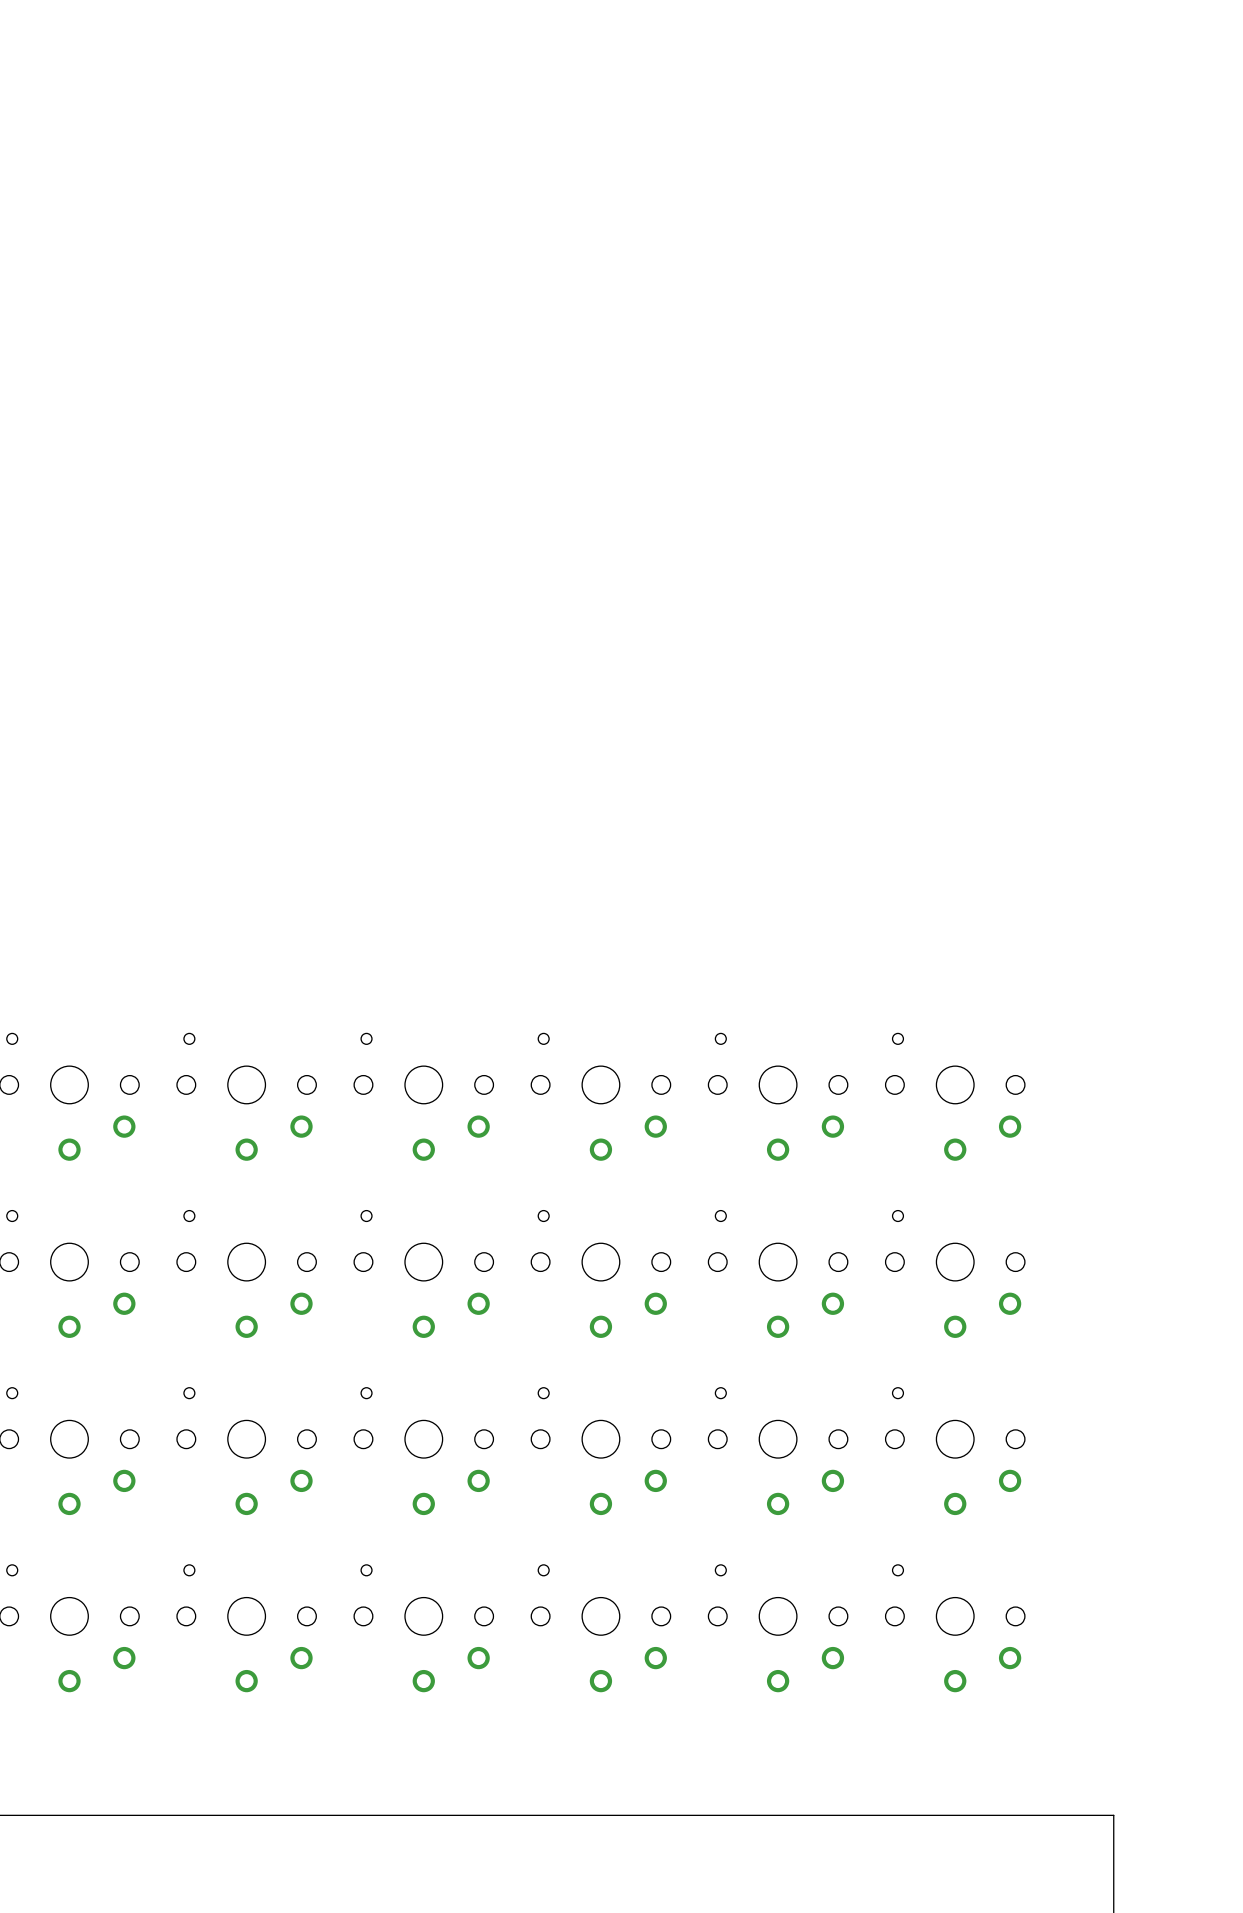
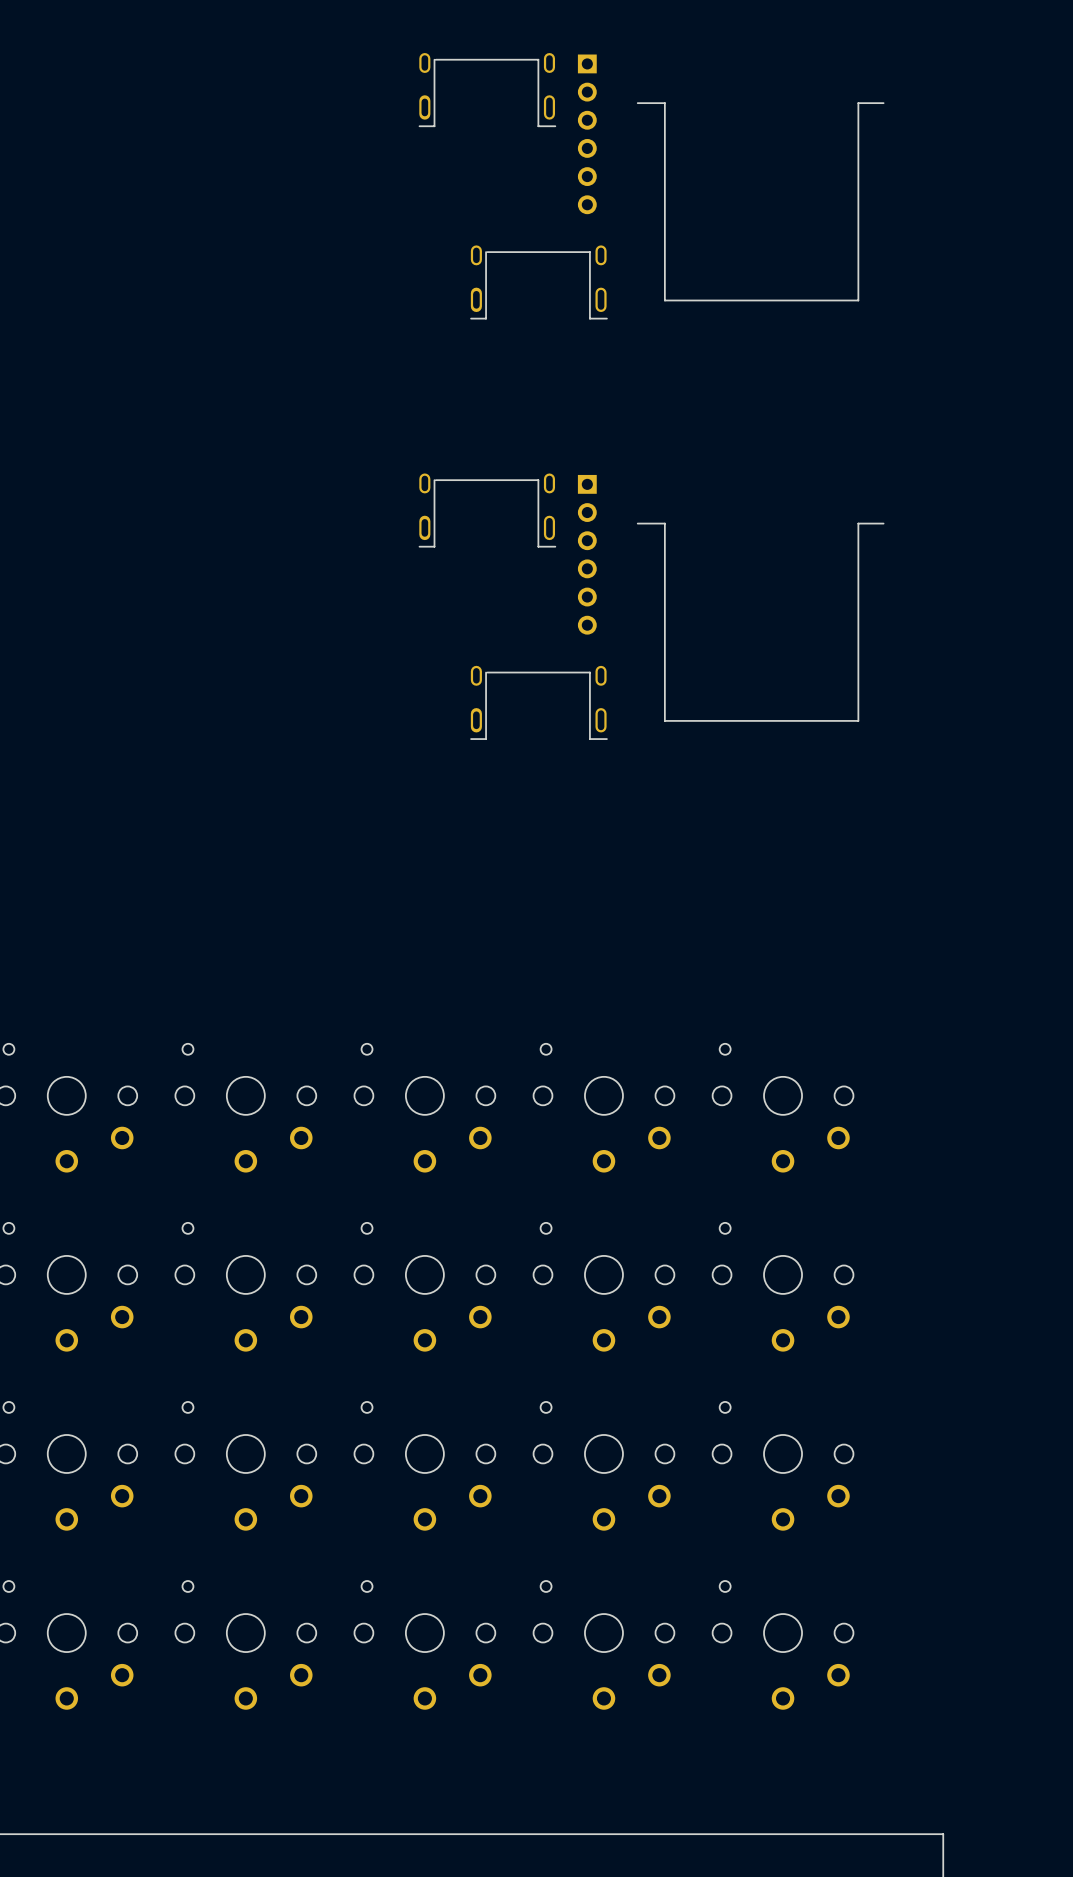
part: none -> (487, 89)
part: none -> (587, 134)
part: none -> (760, 201)
part: none -> (538, 282)
part: none -> (487, 510)
part: none -> (587, 554)
part: none -> (760, 622)
part: none -> (538, 702)

